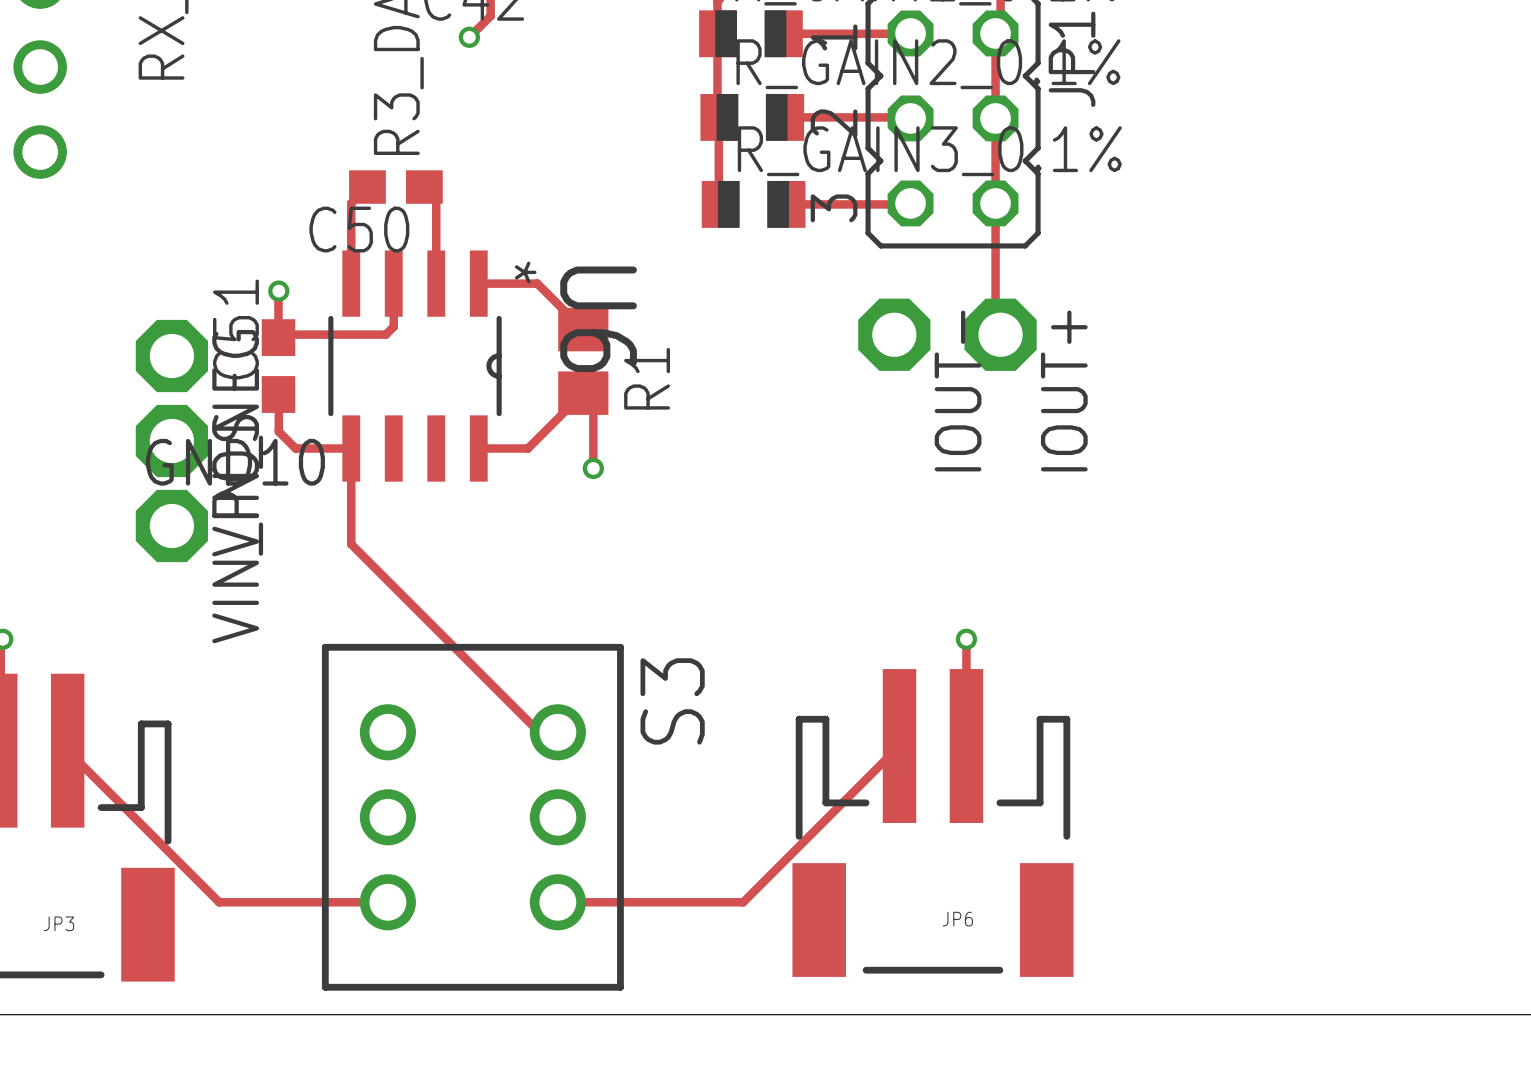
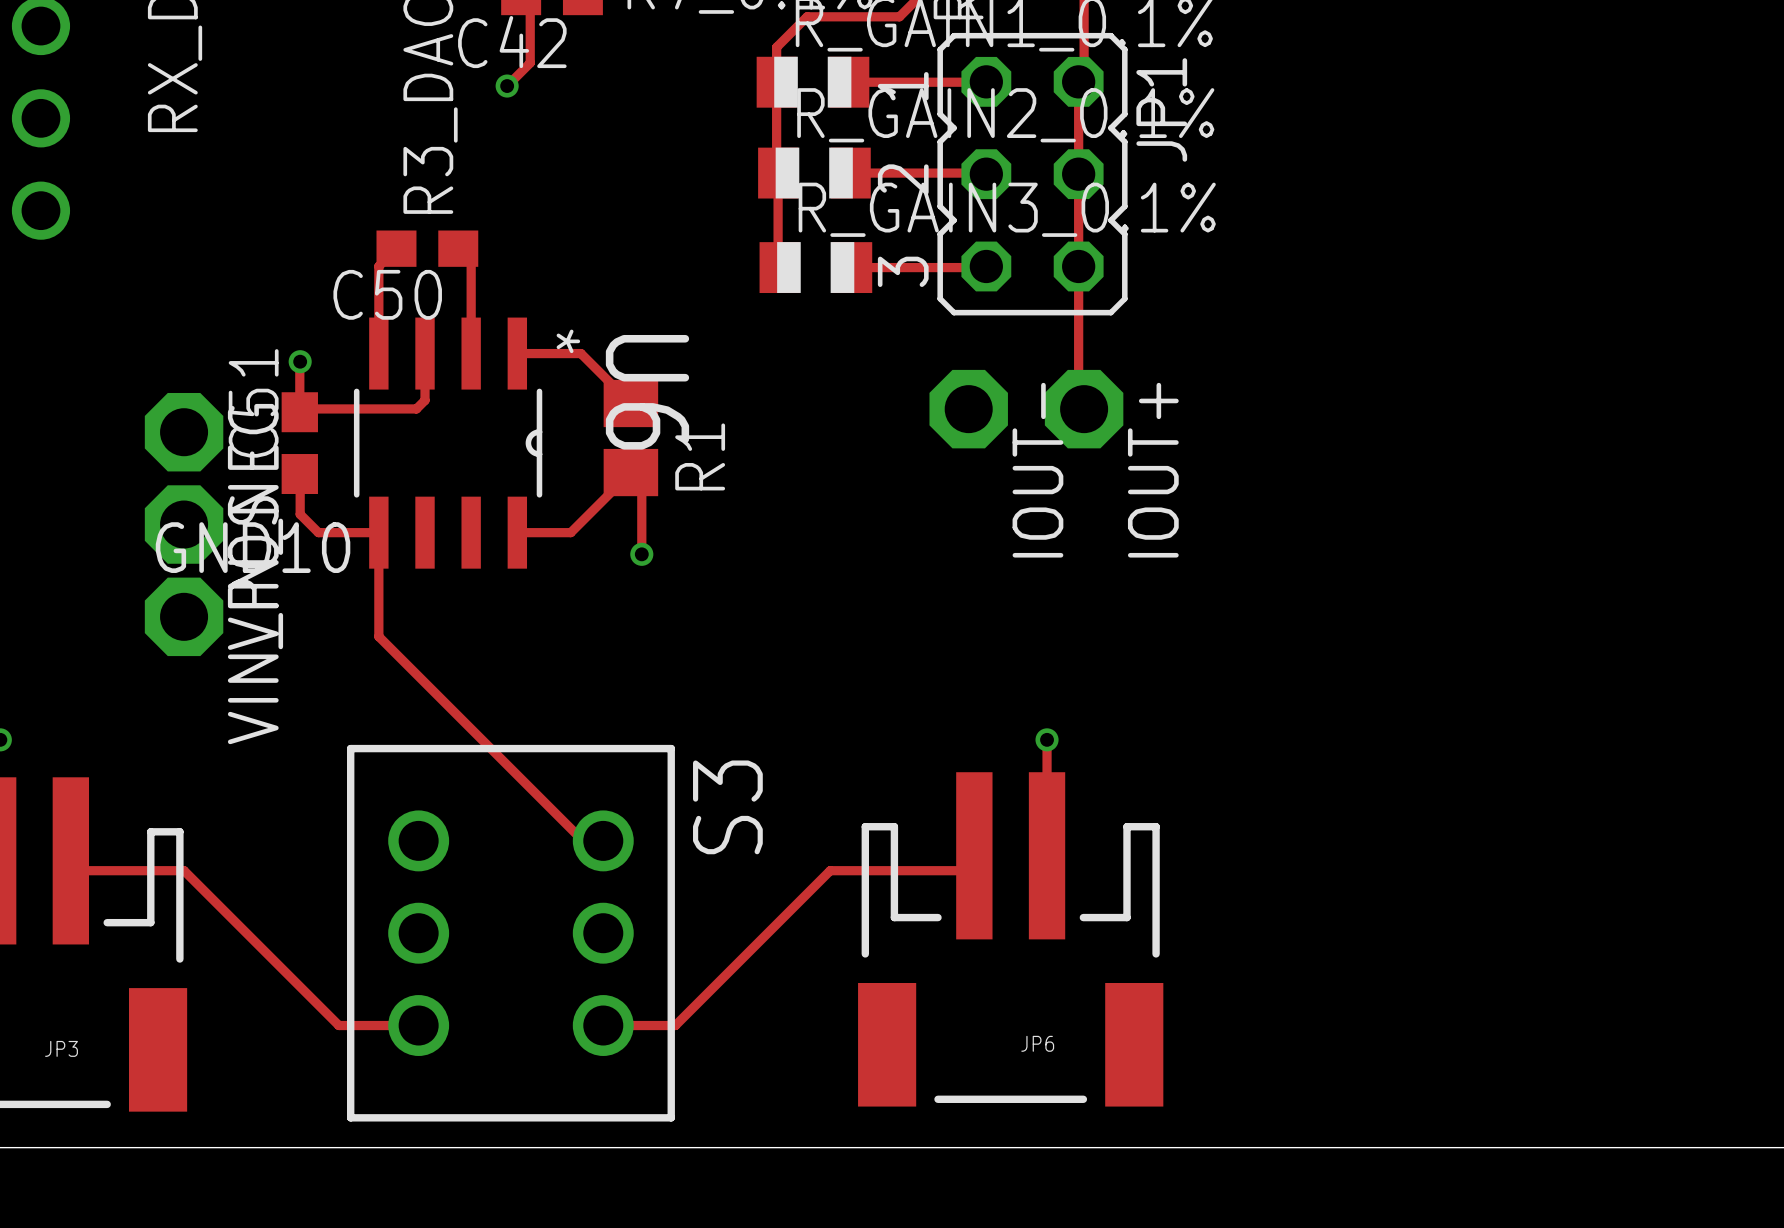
track: (76, 759) (219, 902) (314, 902) -> (80, 870) (184, 870) (338, 1025)
track: (885, 759) (743, 902) (624, 902) -> (959, 870) (830, 870) (675, 1025)

